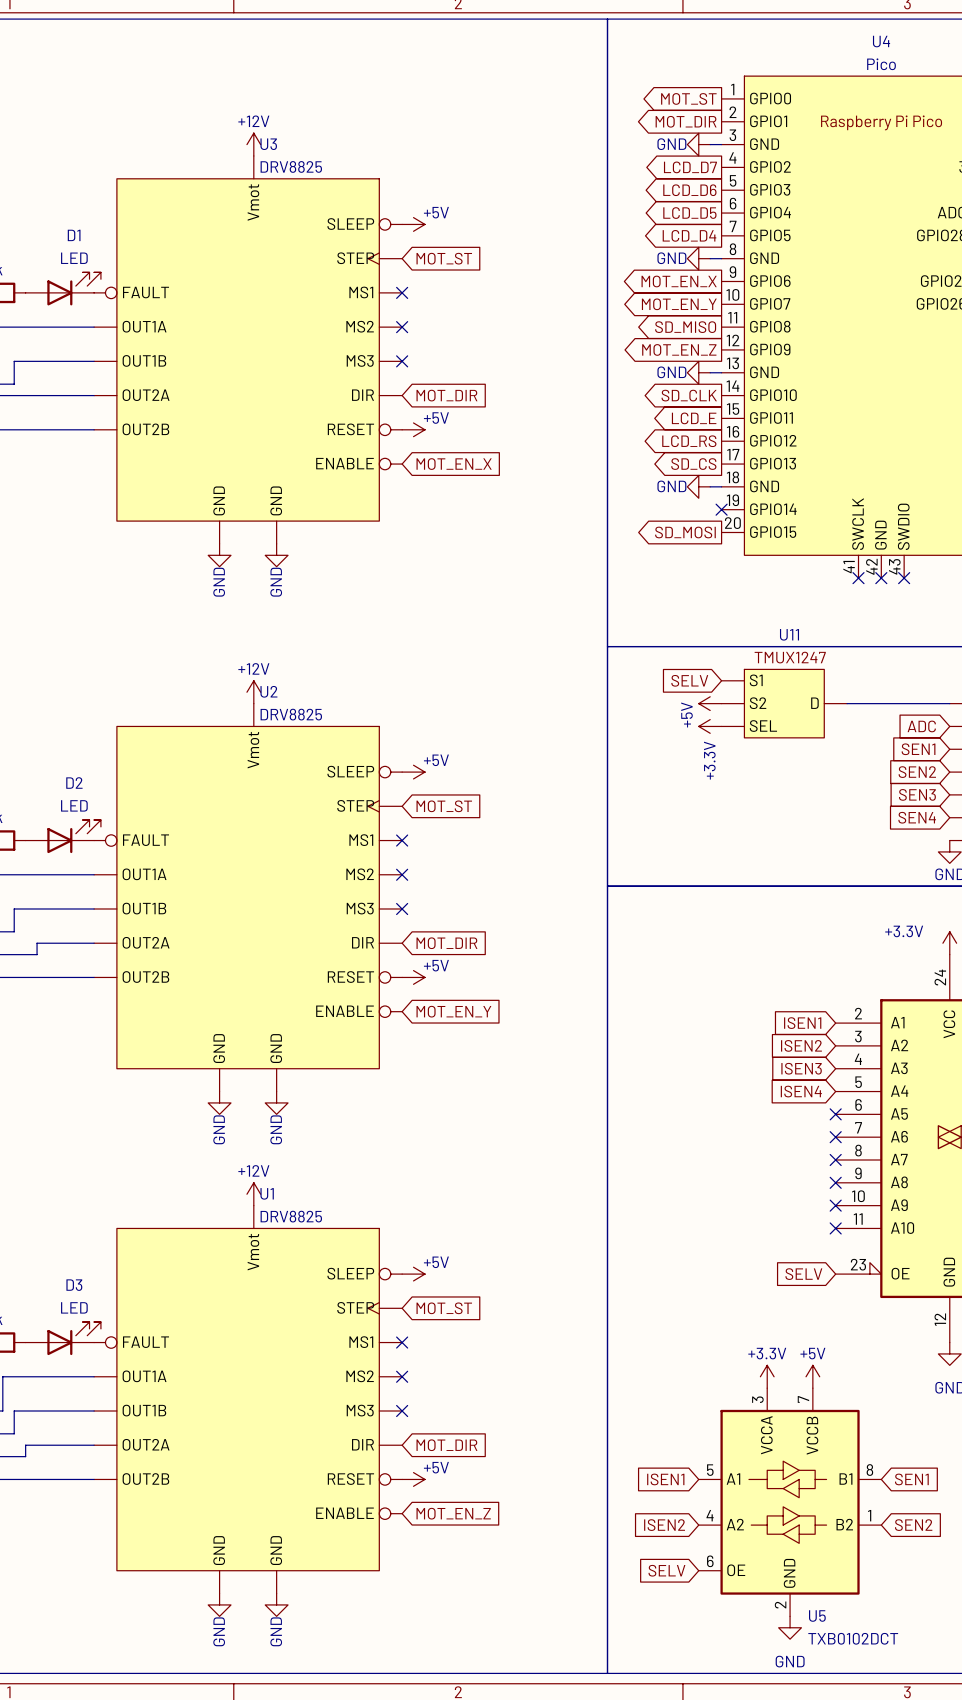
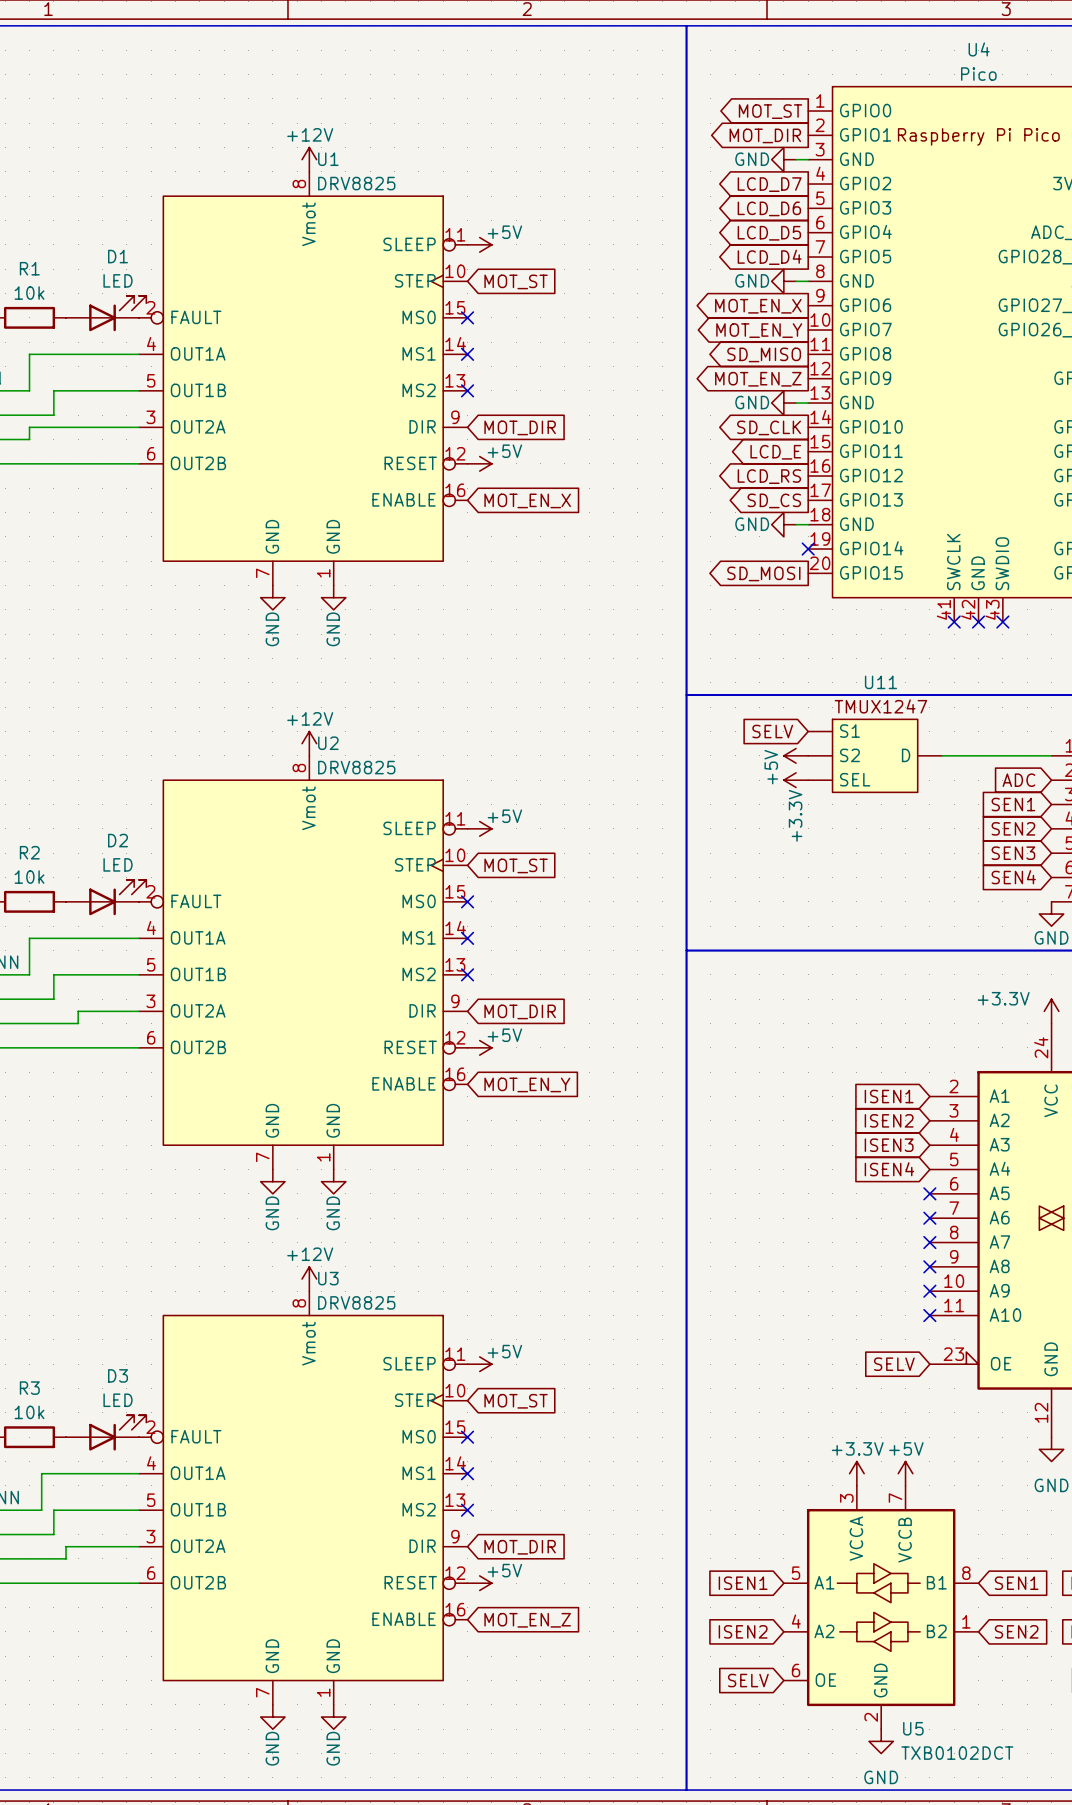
U3 symbol: [94, 155, 403, 544] -> [139, 1291, 468, 1705]
U2 symbol: [94, 703, 403, 1092] -> [139, 755, 468, 1170]
U1 symbol: [94, 1205, 403, 1594] -> [139, 171, 468, 586]

